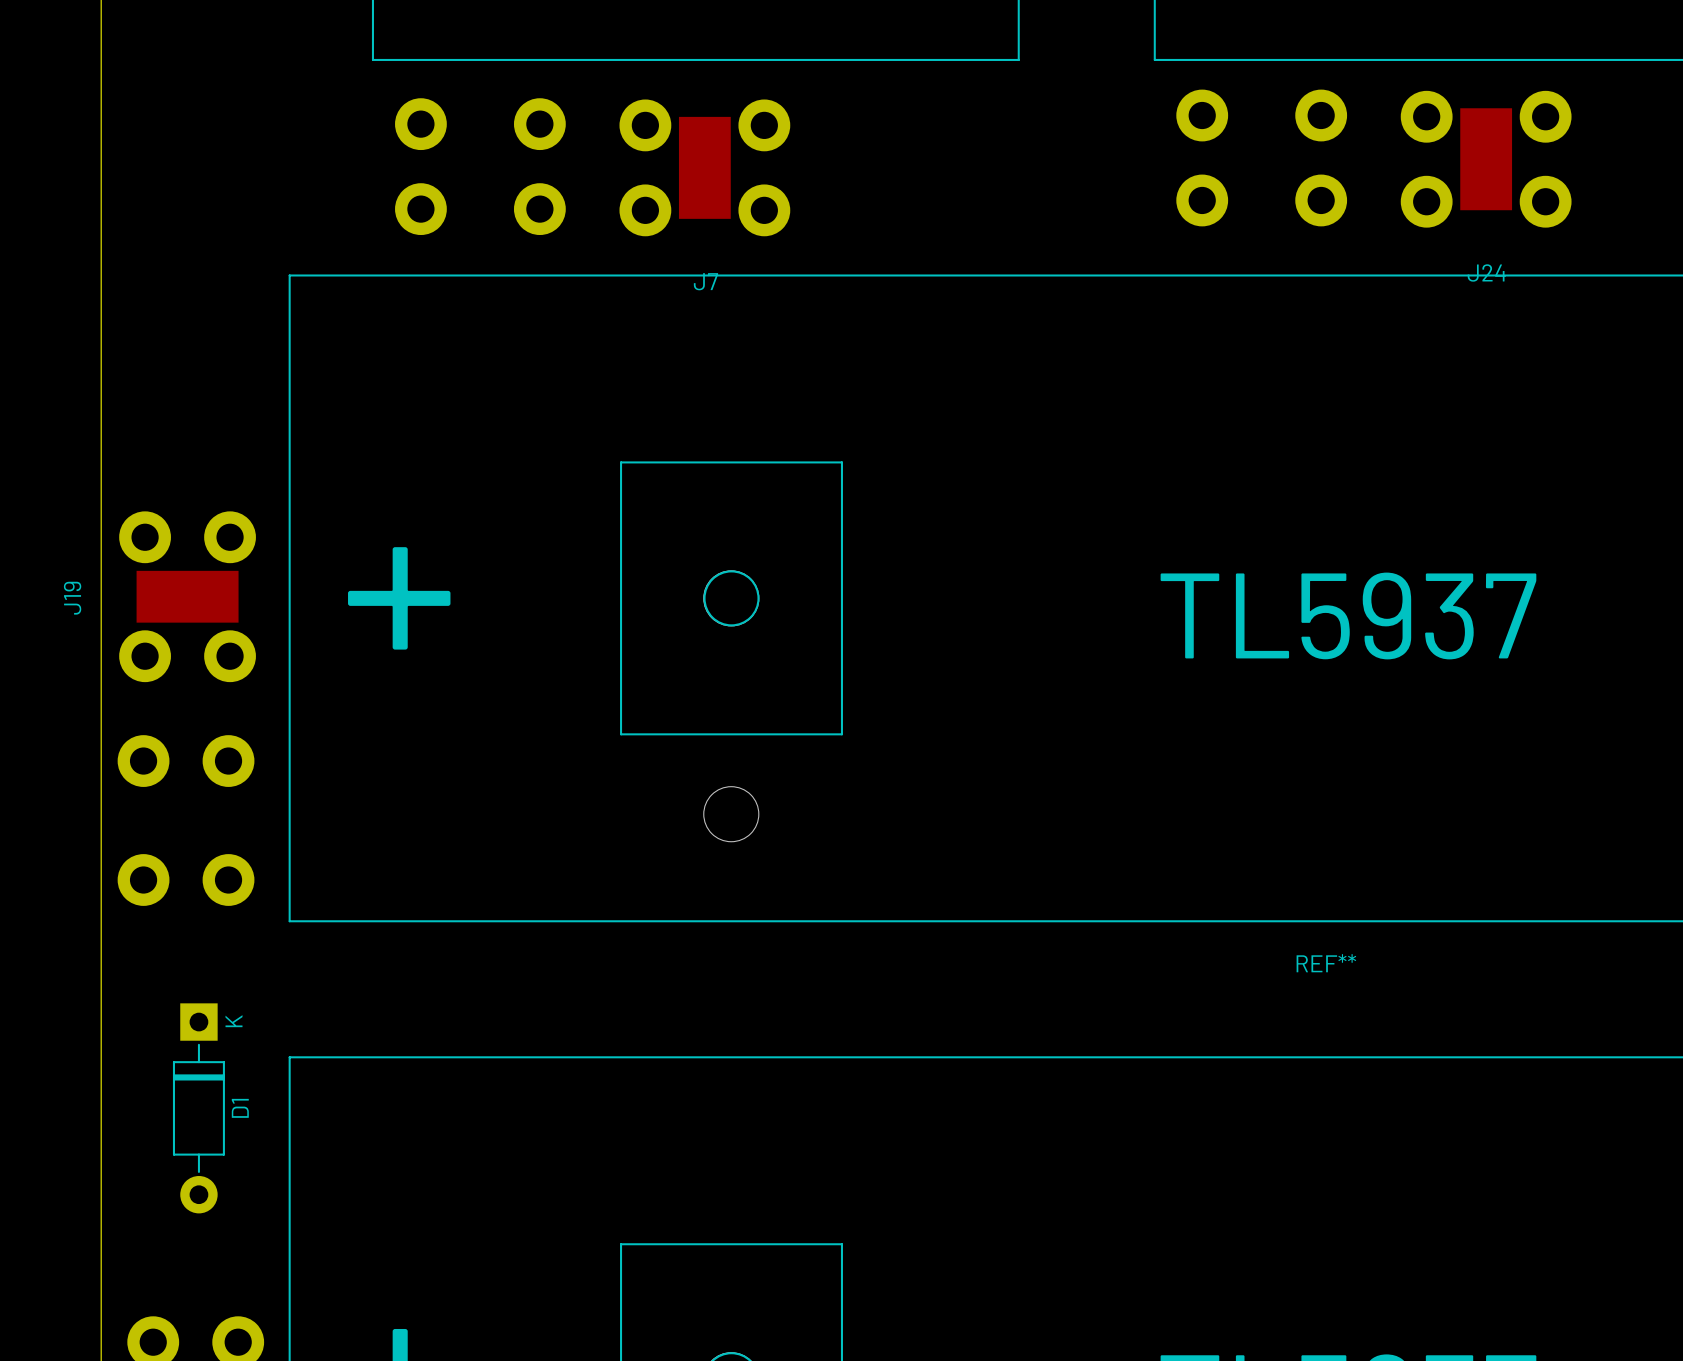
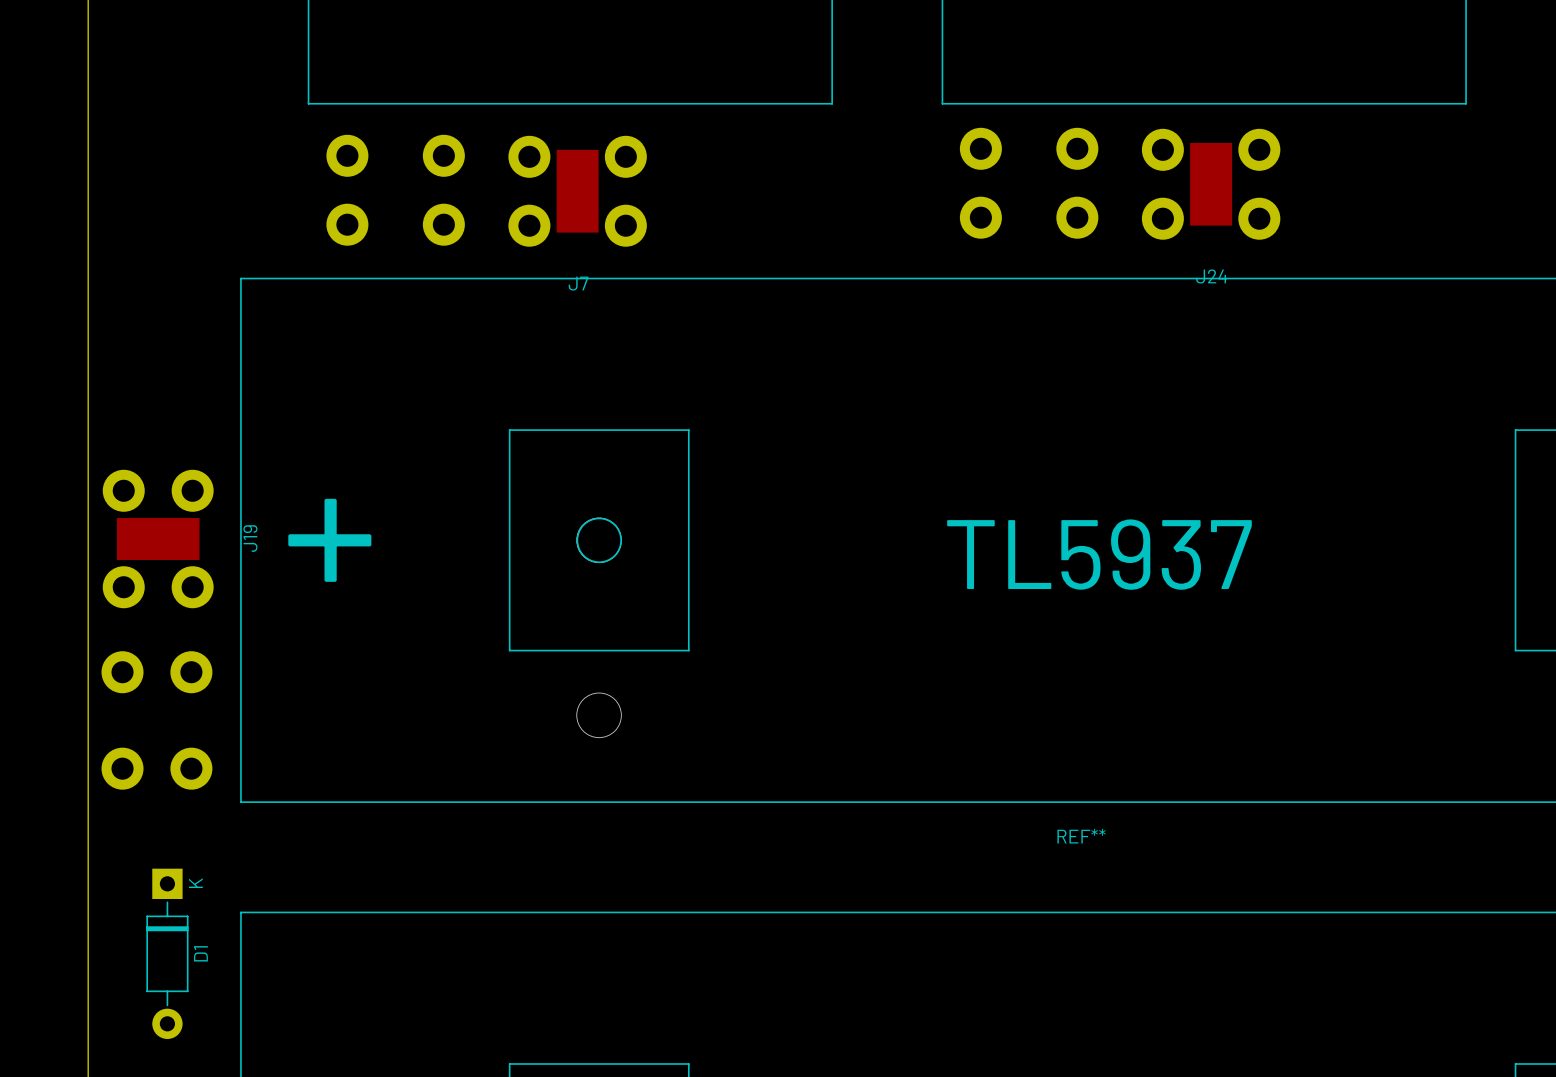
J19 name position: J19 (72, 598) -> J19 (250, 538)

